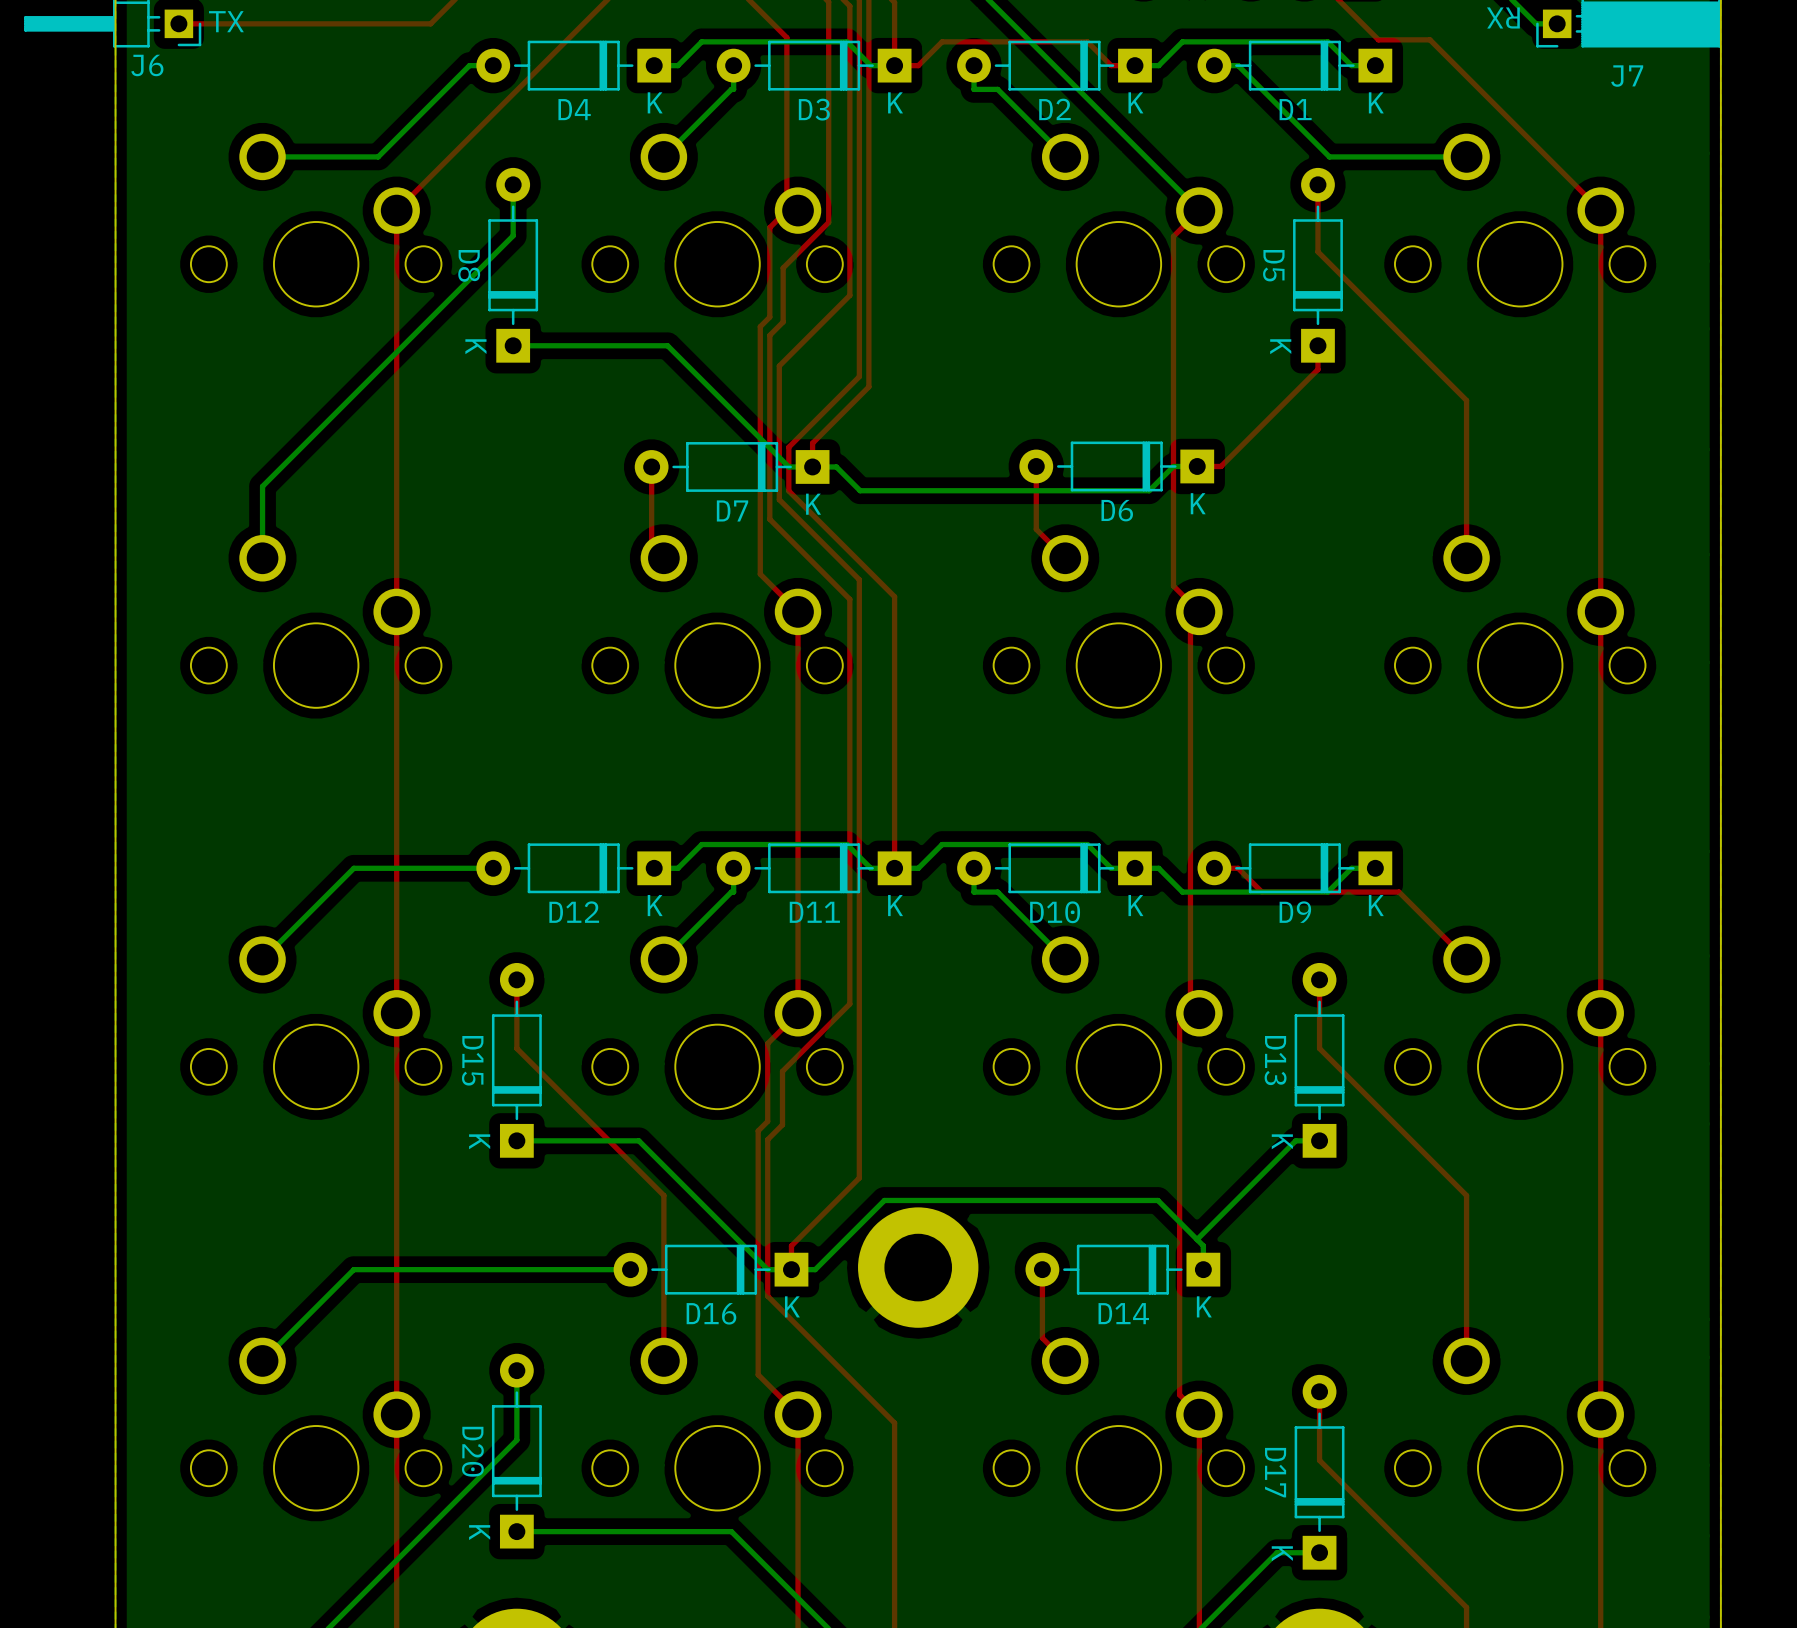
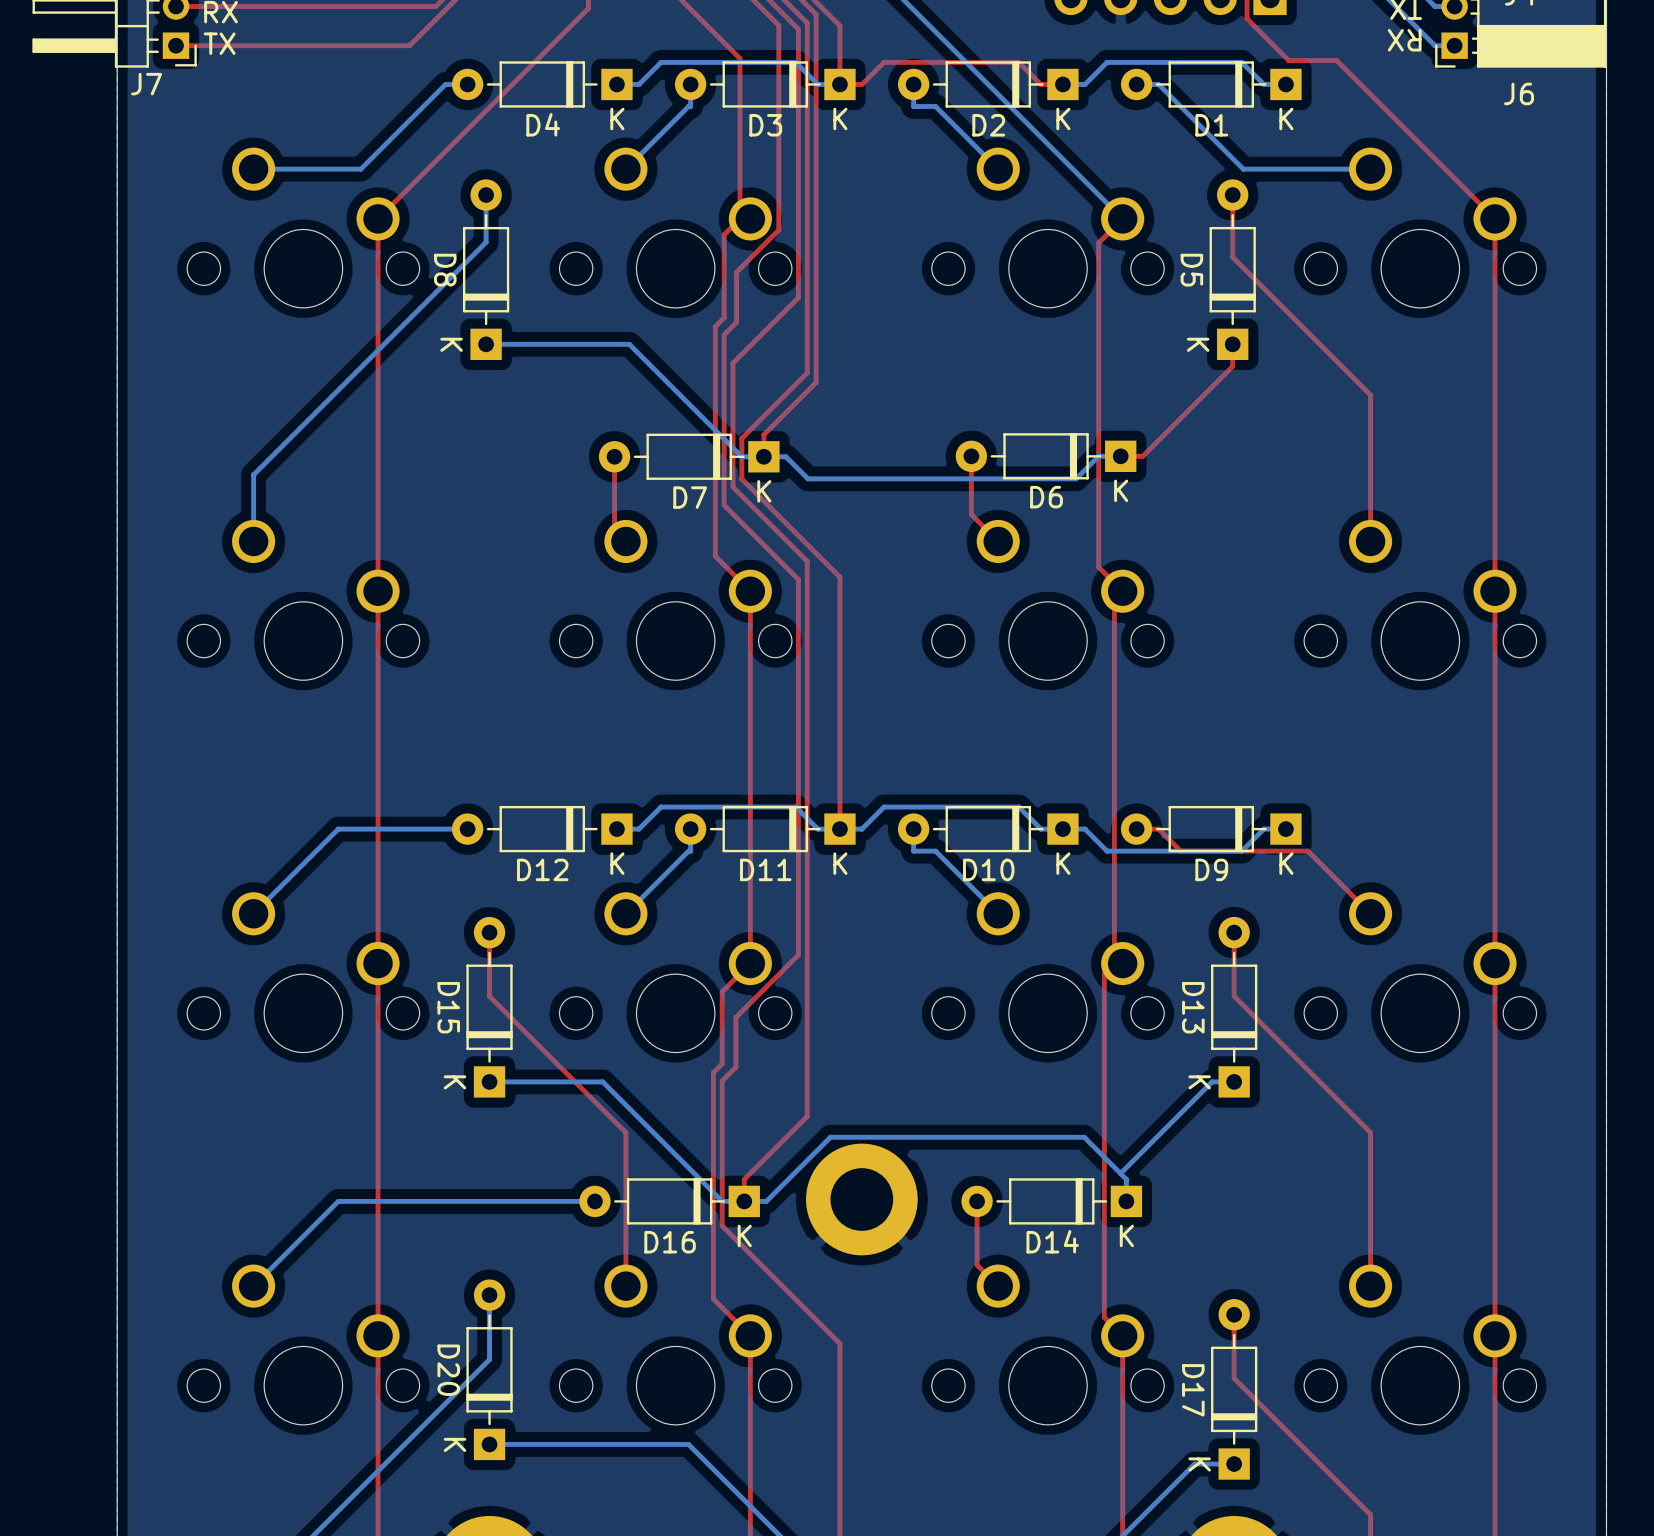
J6 name: J6 (147, 65) -> J7 (146, 84)
J7 name: J7 (1627, 76) -> J6 (1519, 93)

